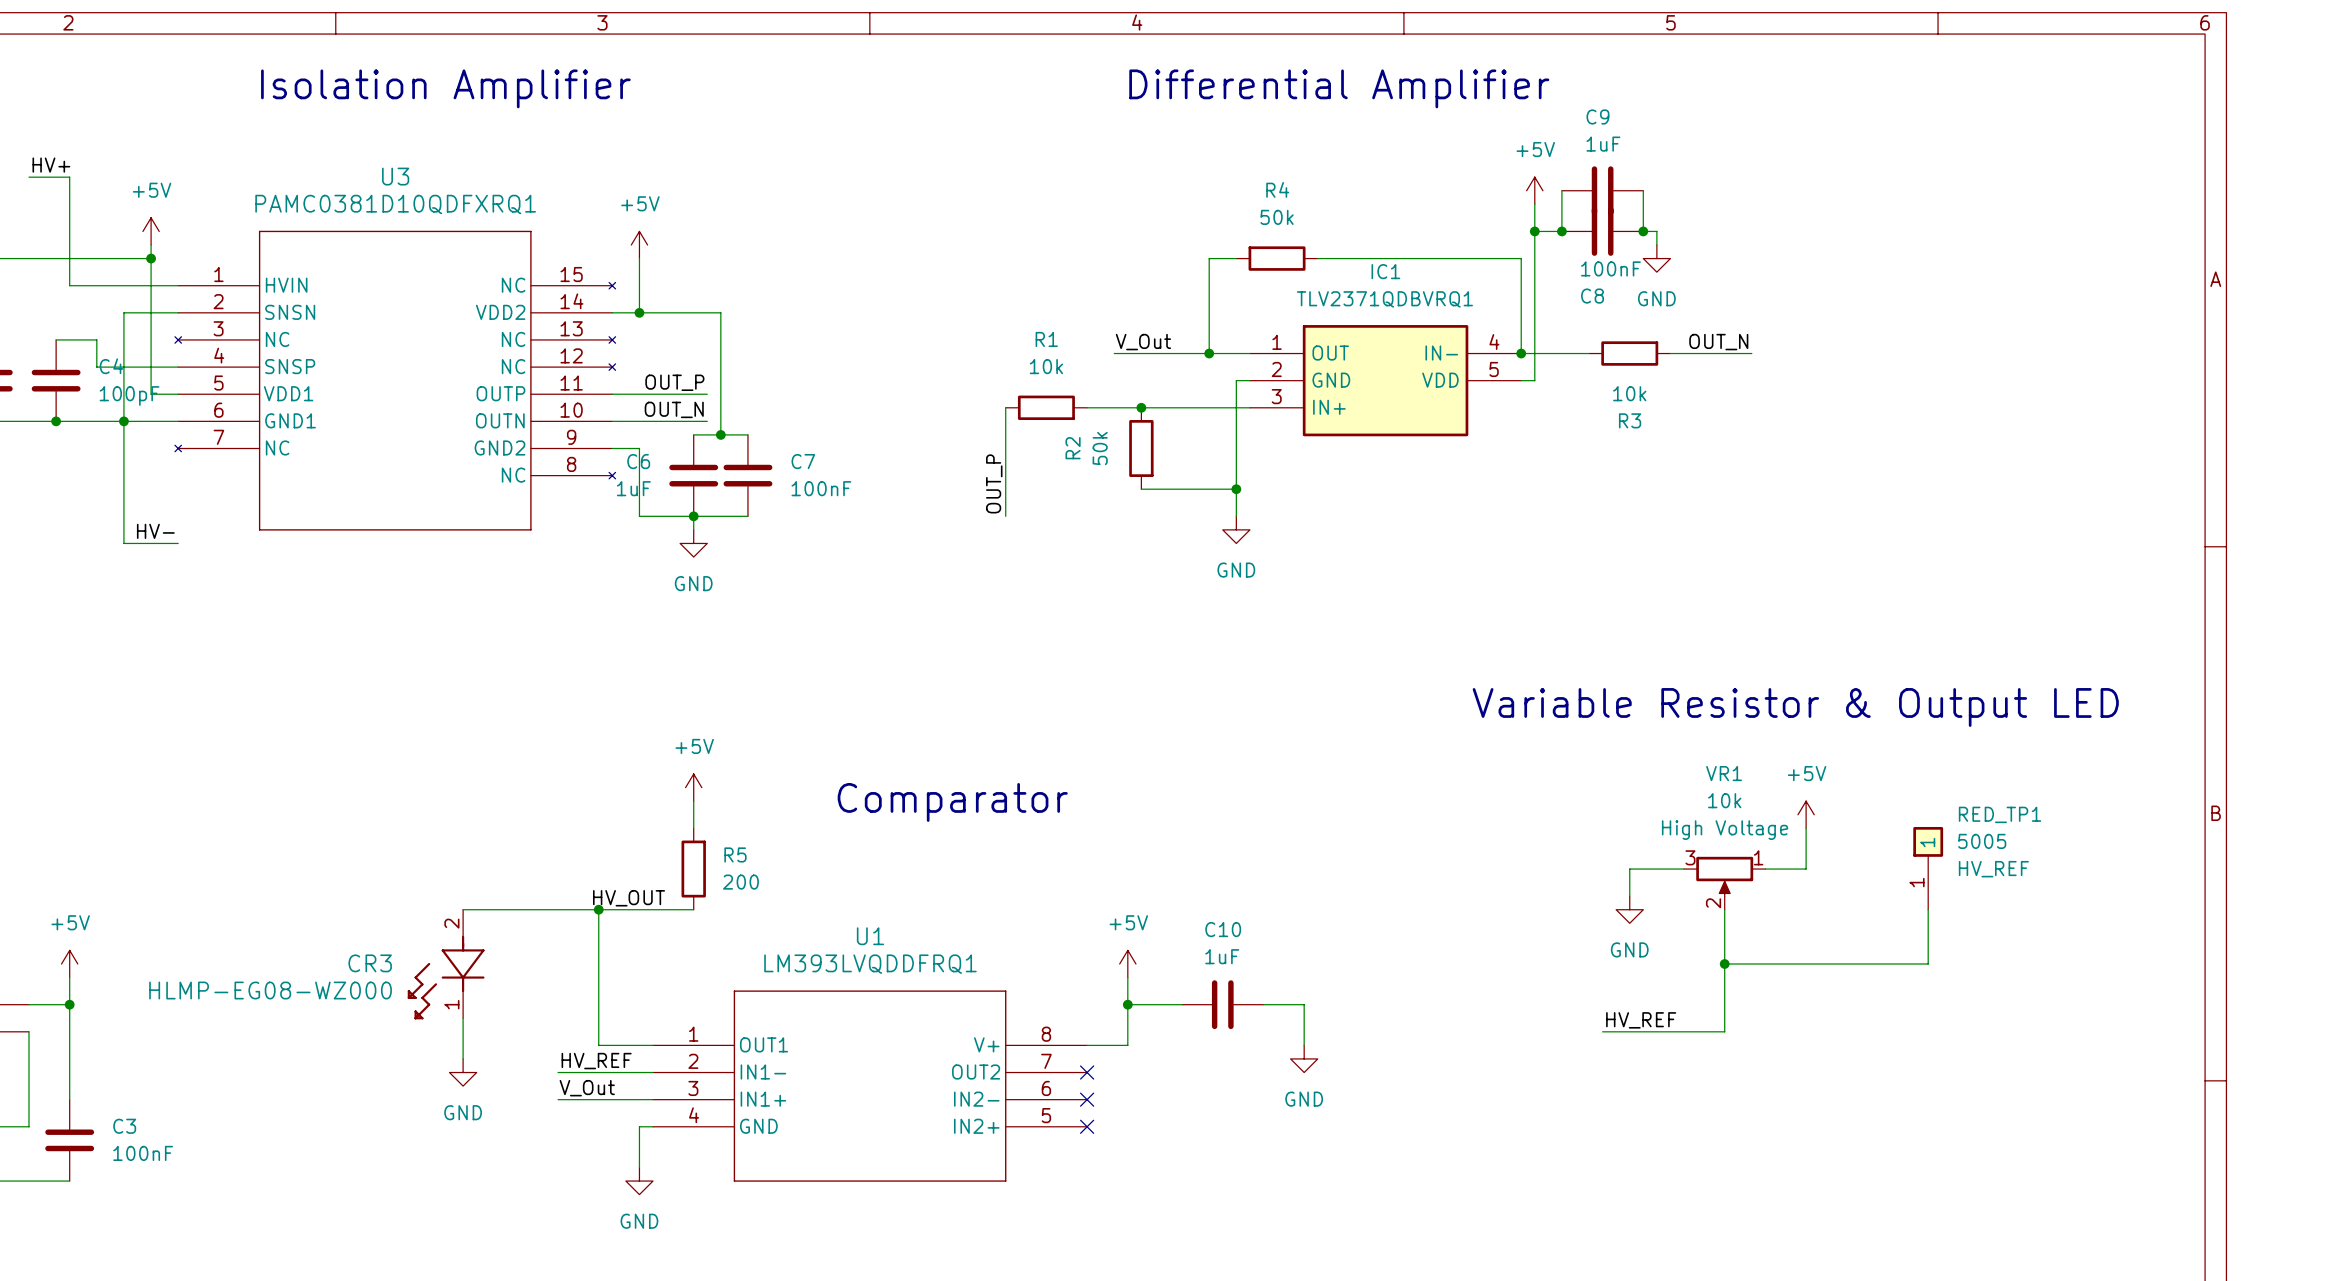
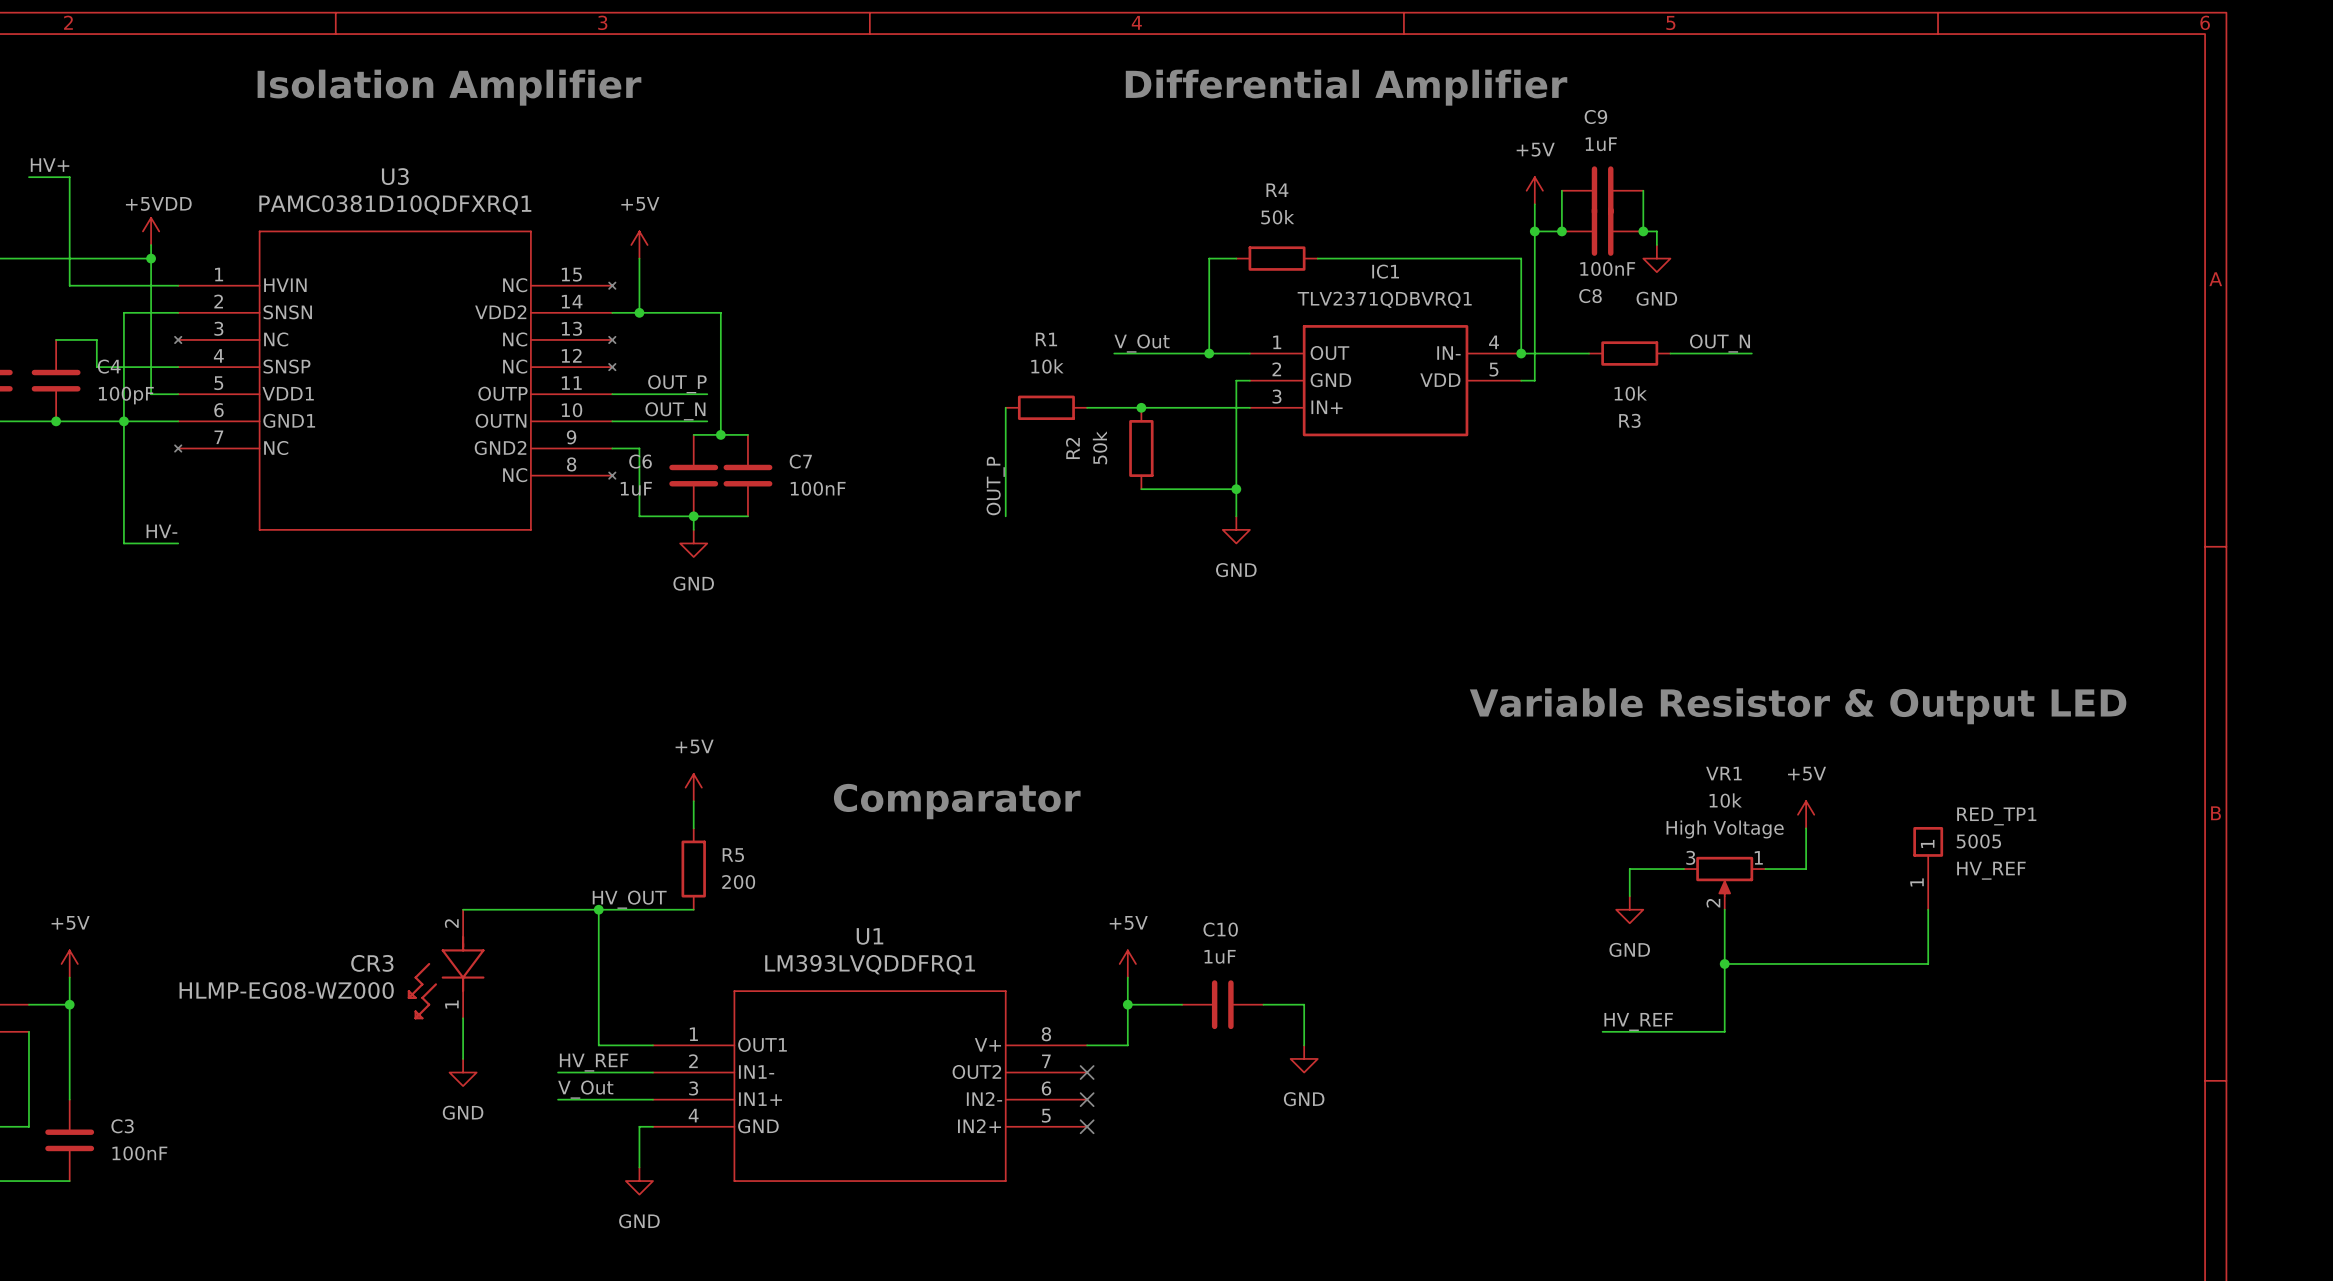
power symbol: +5V (151, 231) -> +5VDD (151, 231)

